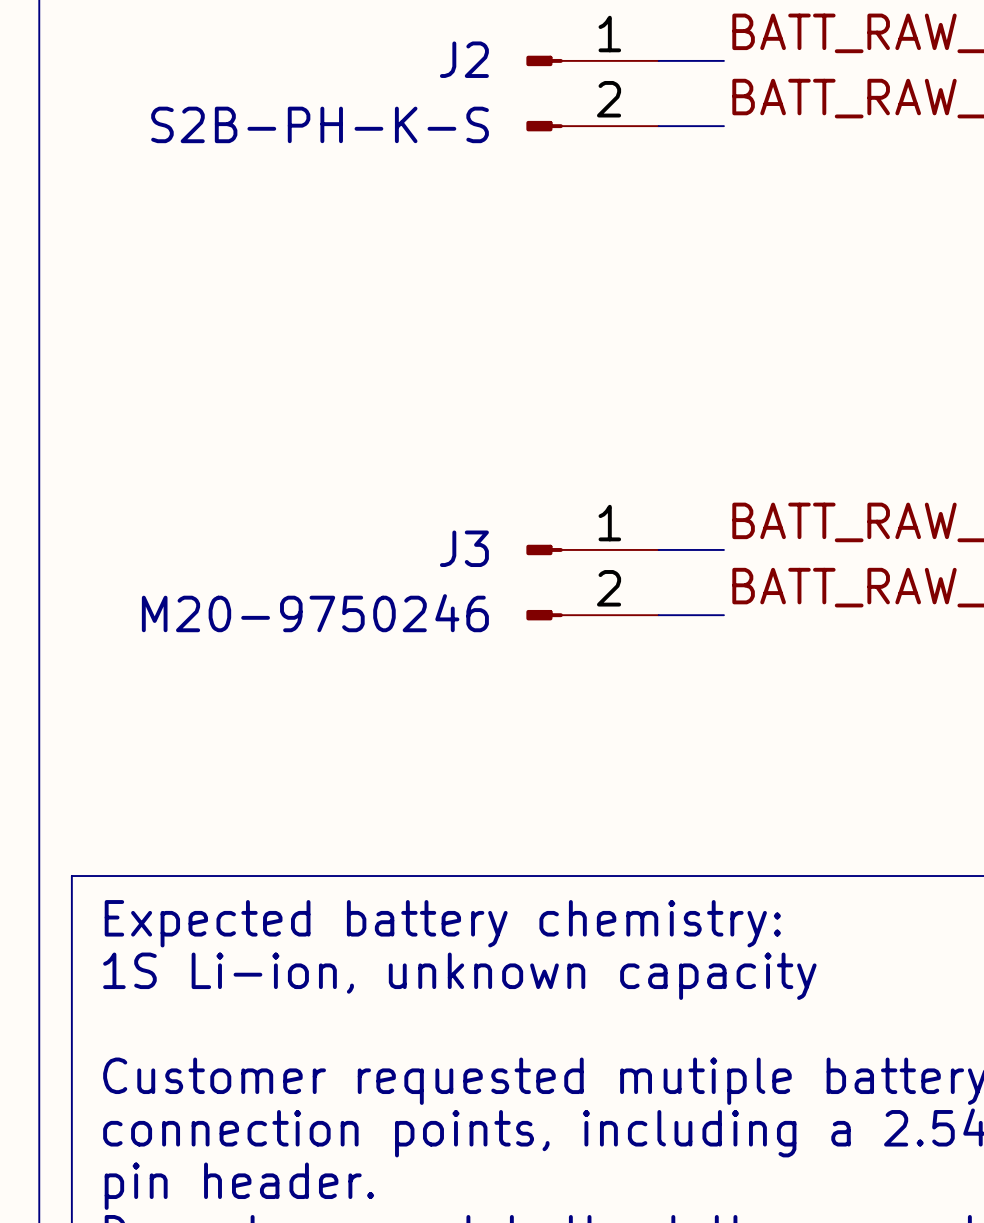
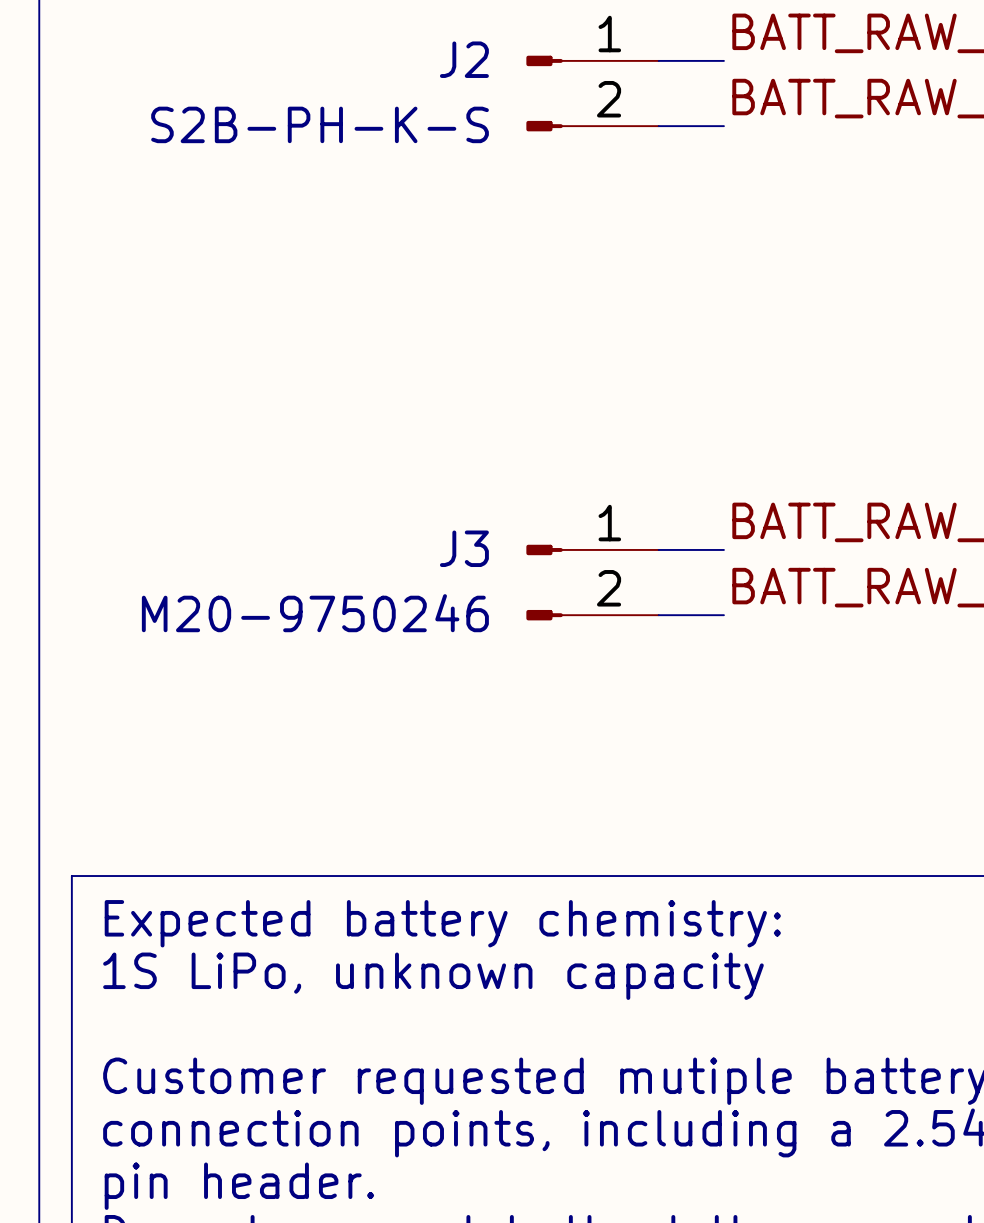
text: 1S Li-ion, unknown capacity (459, 976) -> 1S LiPo, unknown capacity (433, 976)

